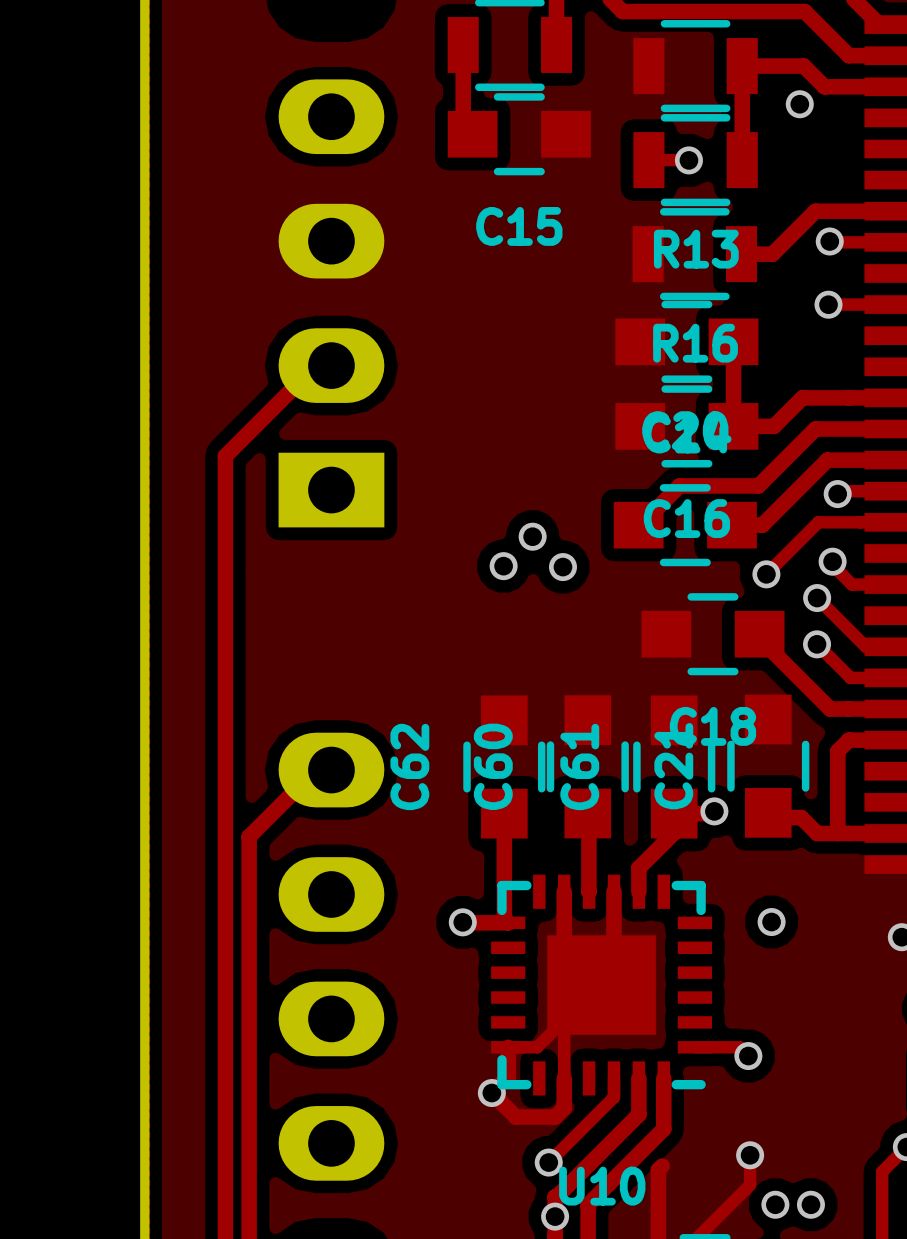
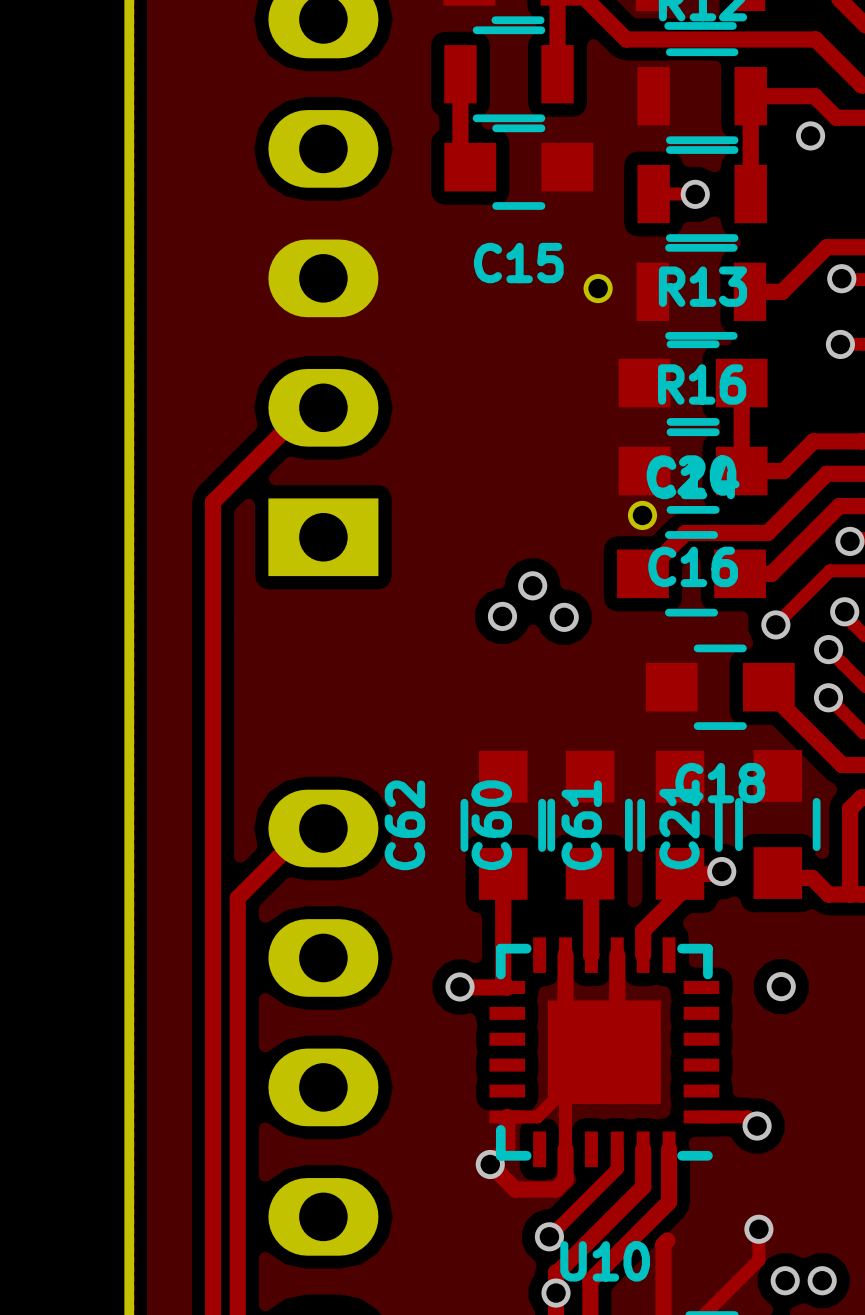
part: none -> (598, 288)
part: none -> (642, 515)

